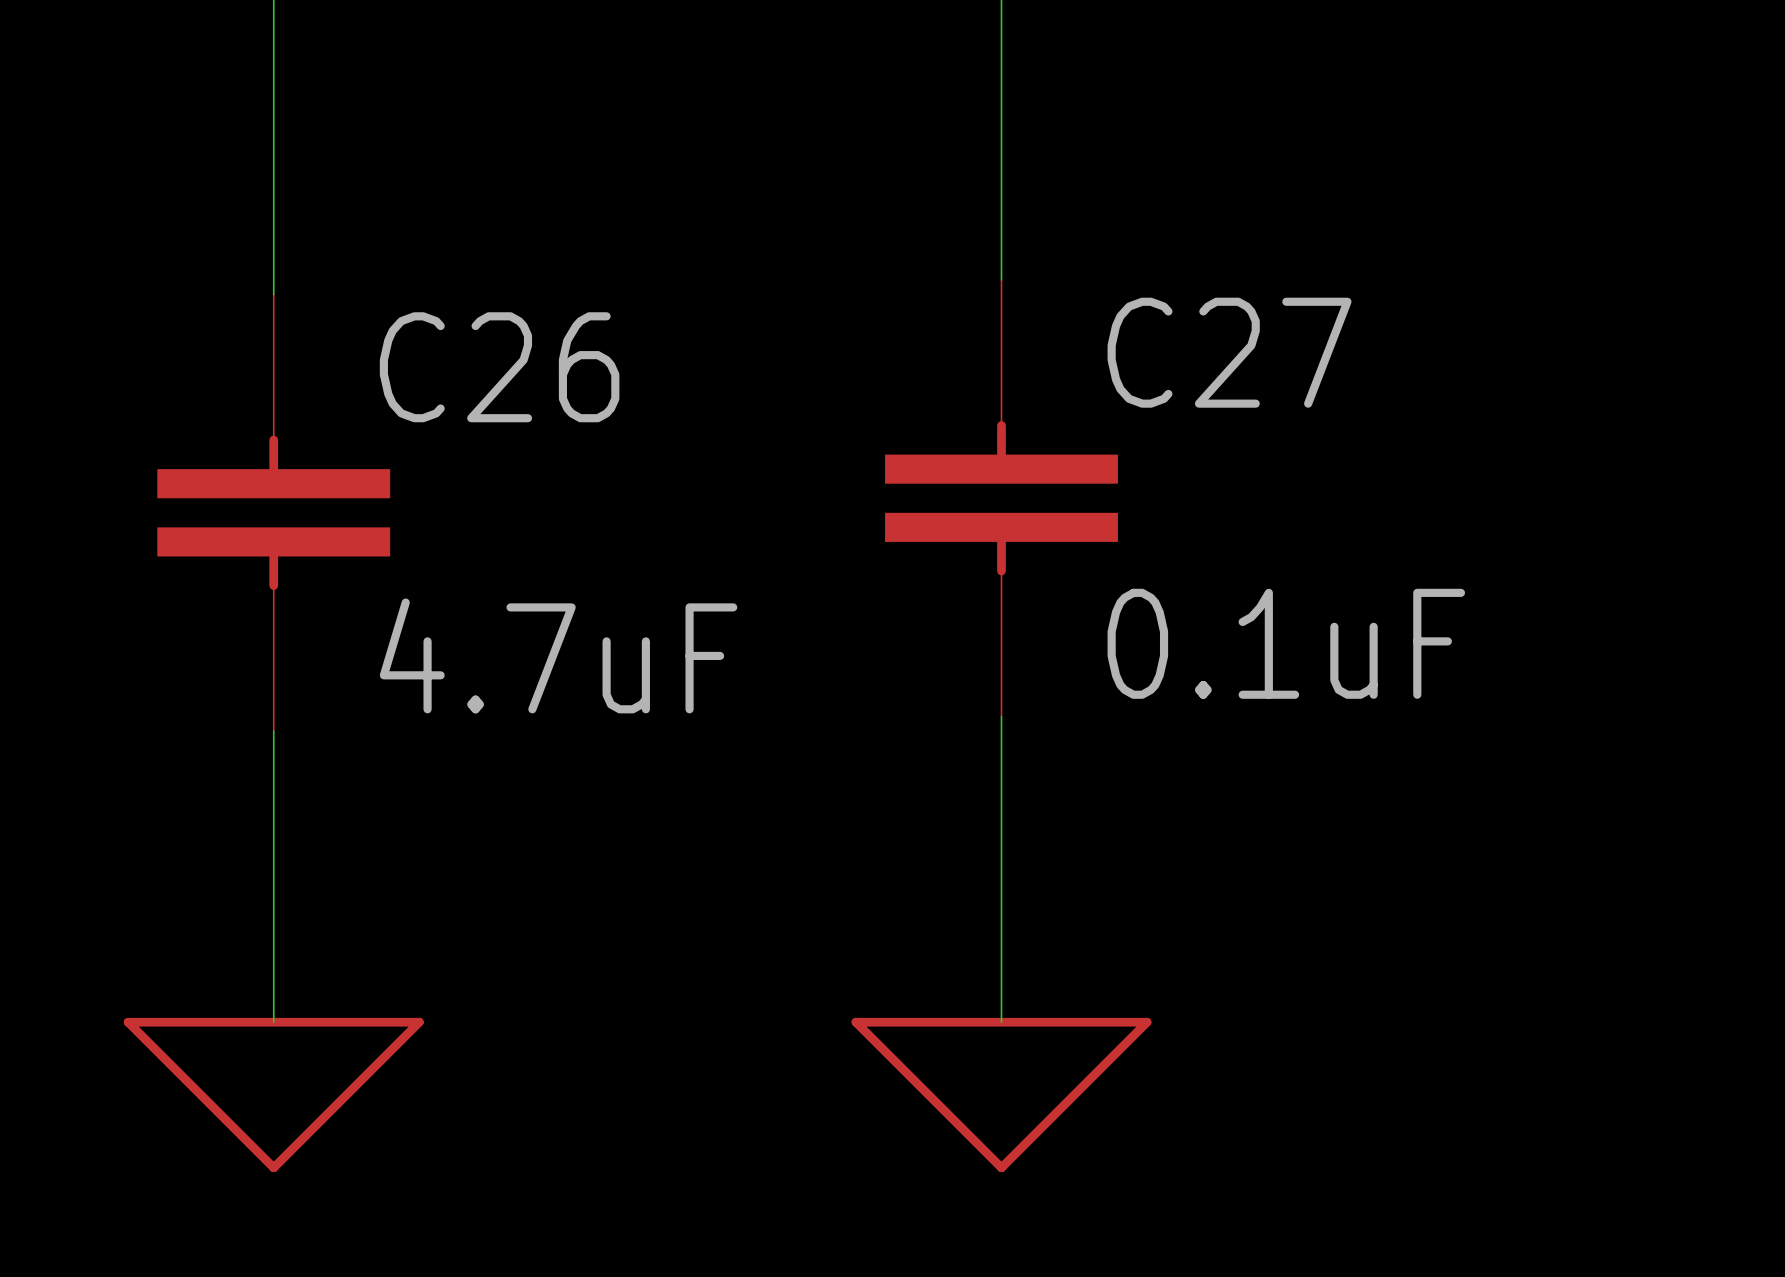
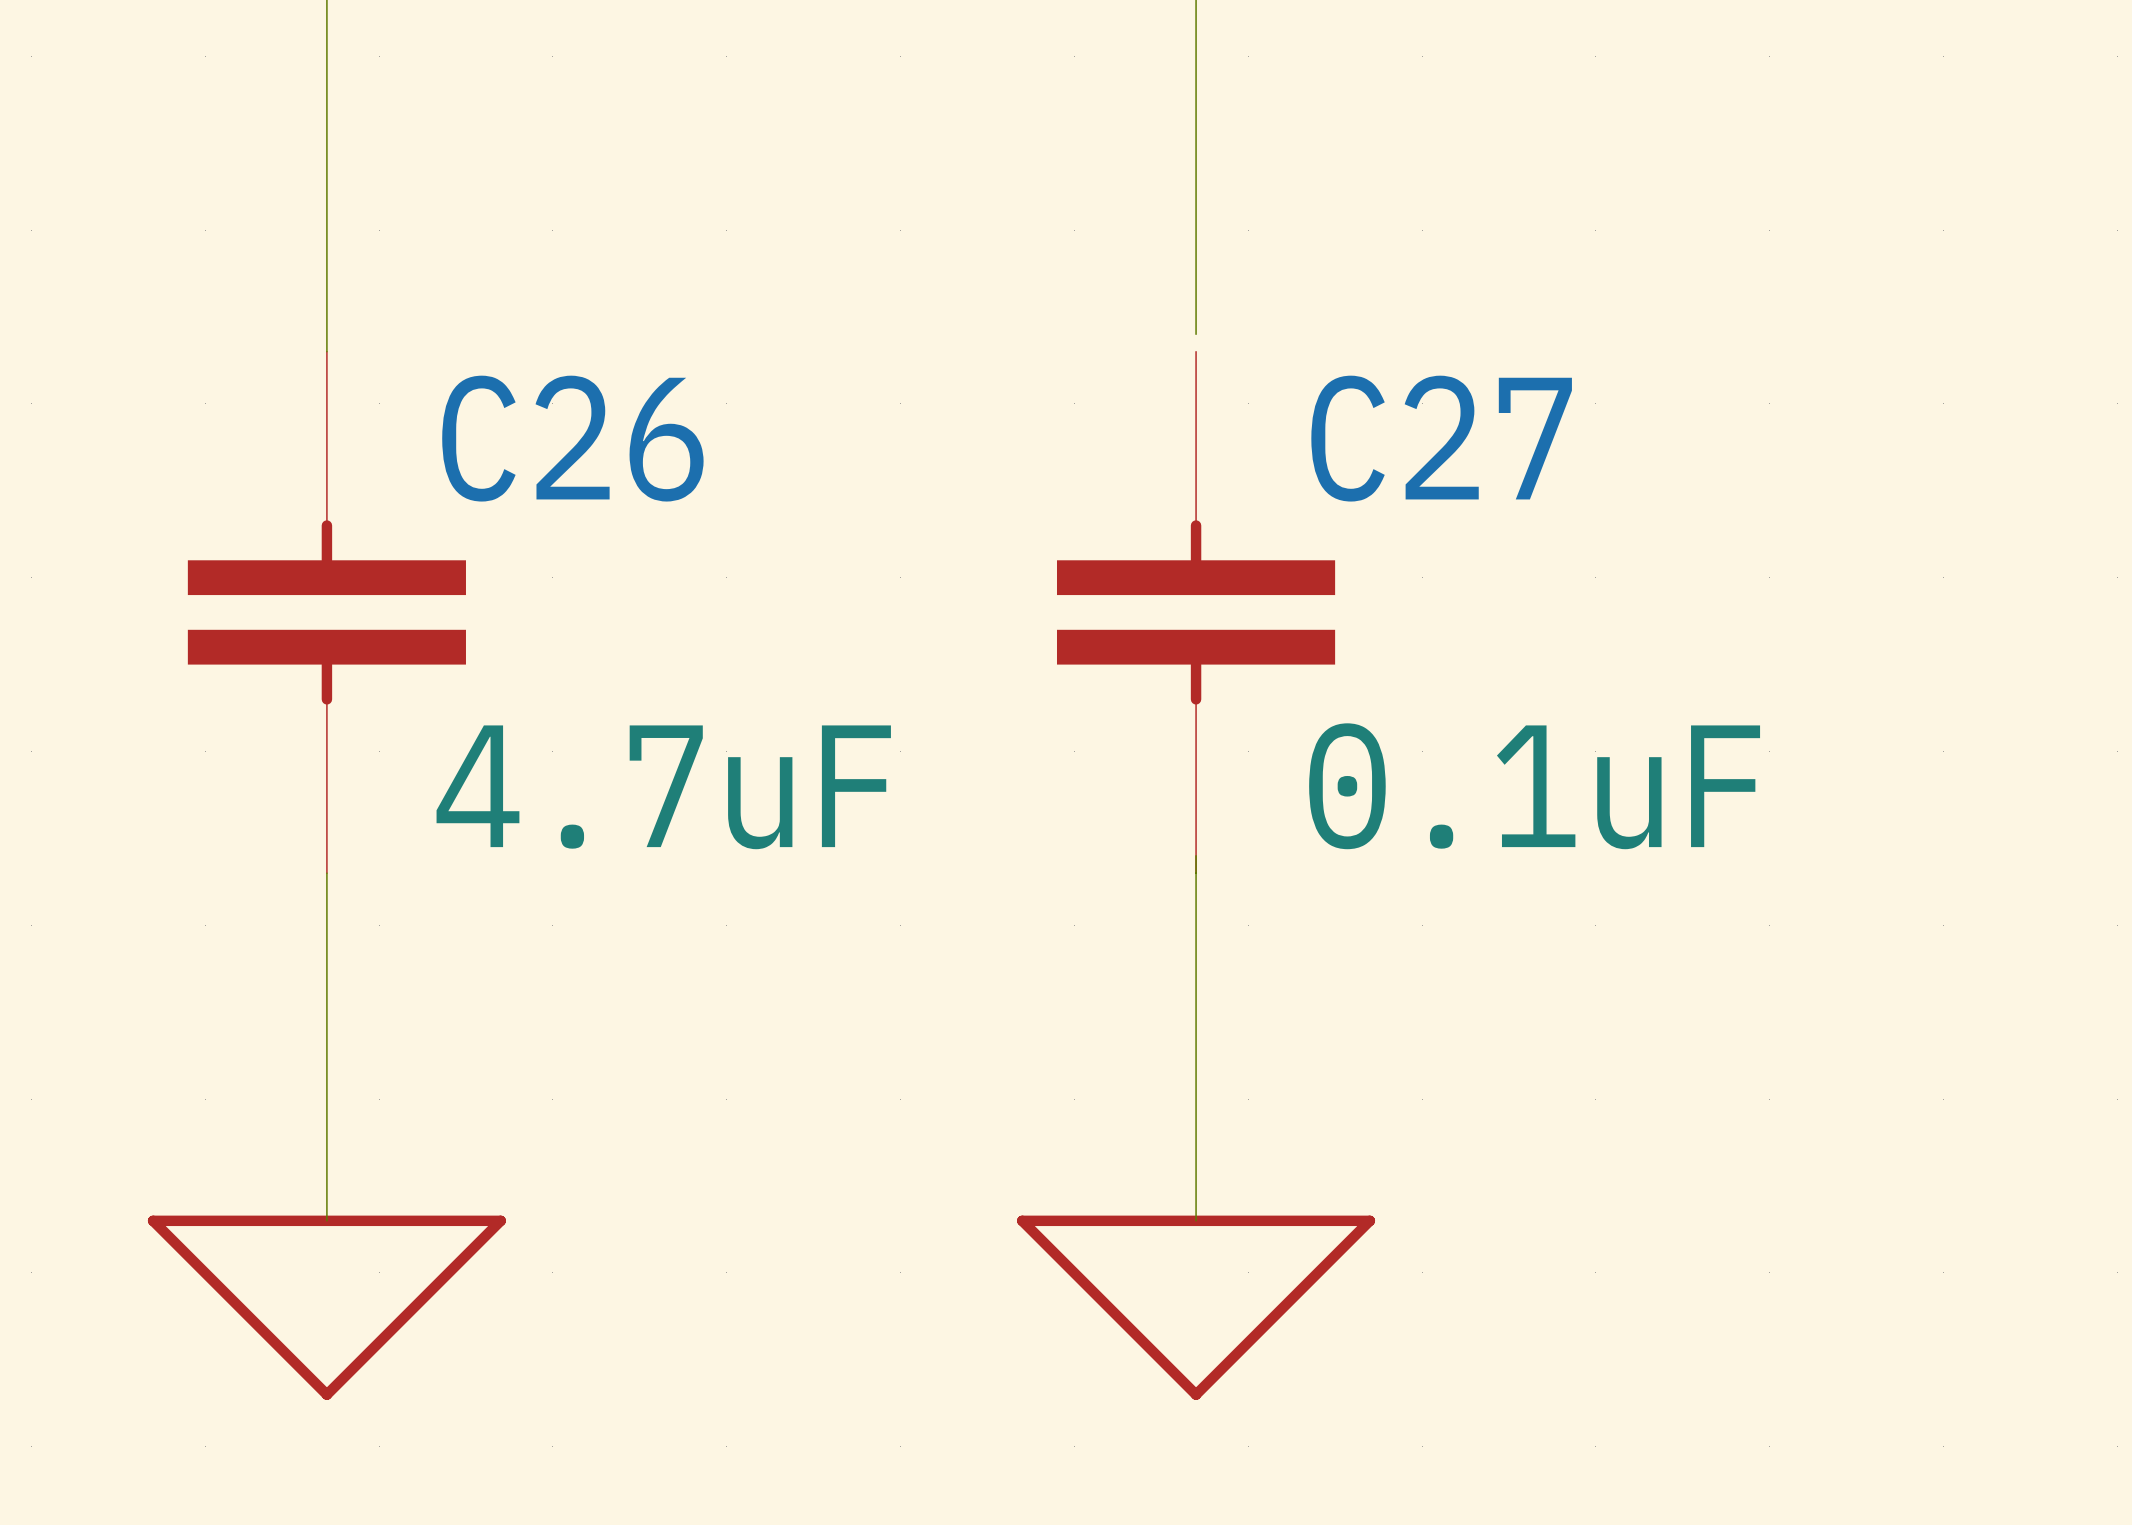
C27 position: (1001, 498) -> (1196, 612)

